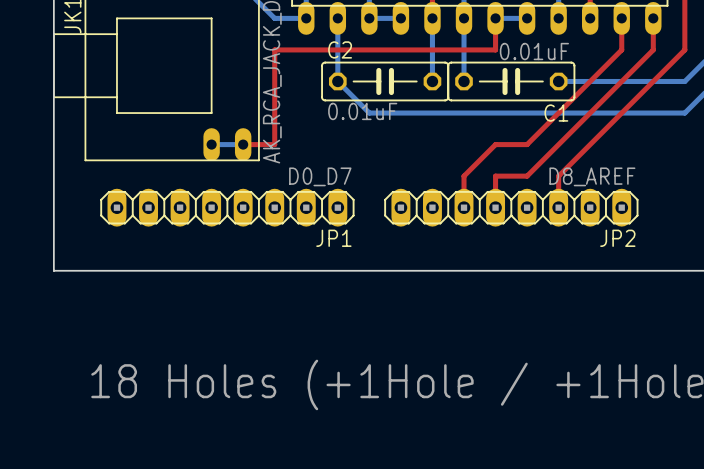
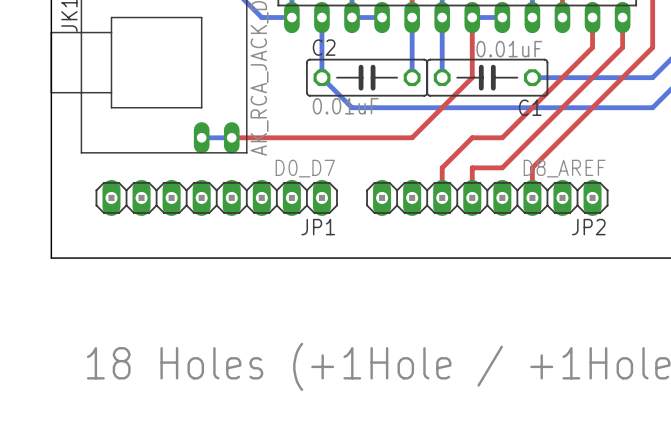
top track: (495, 49) (274, 49) (274, 144) -> (472, 47) (472, 77) (412, 137) (261, 137)

